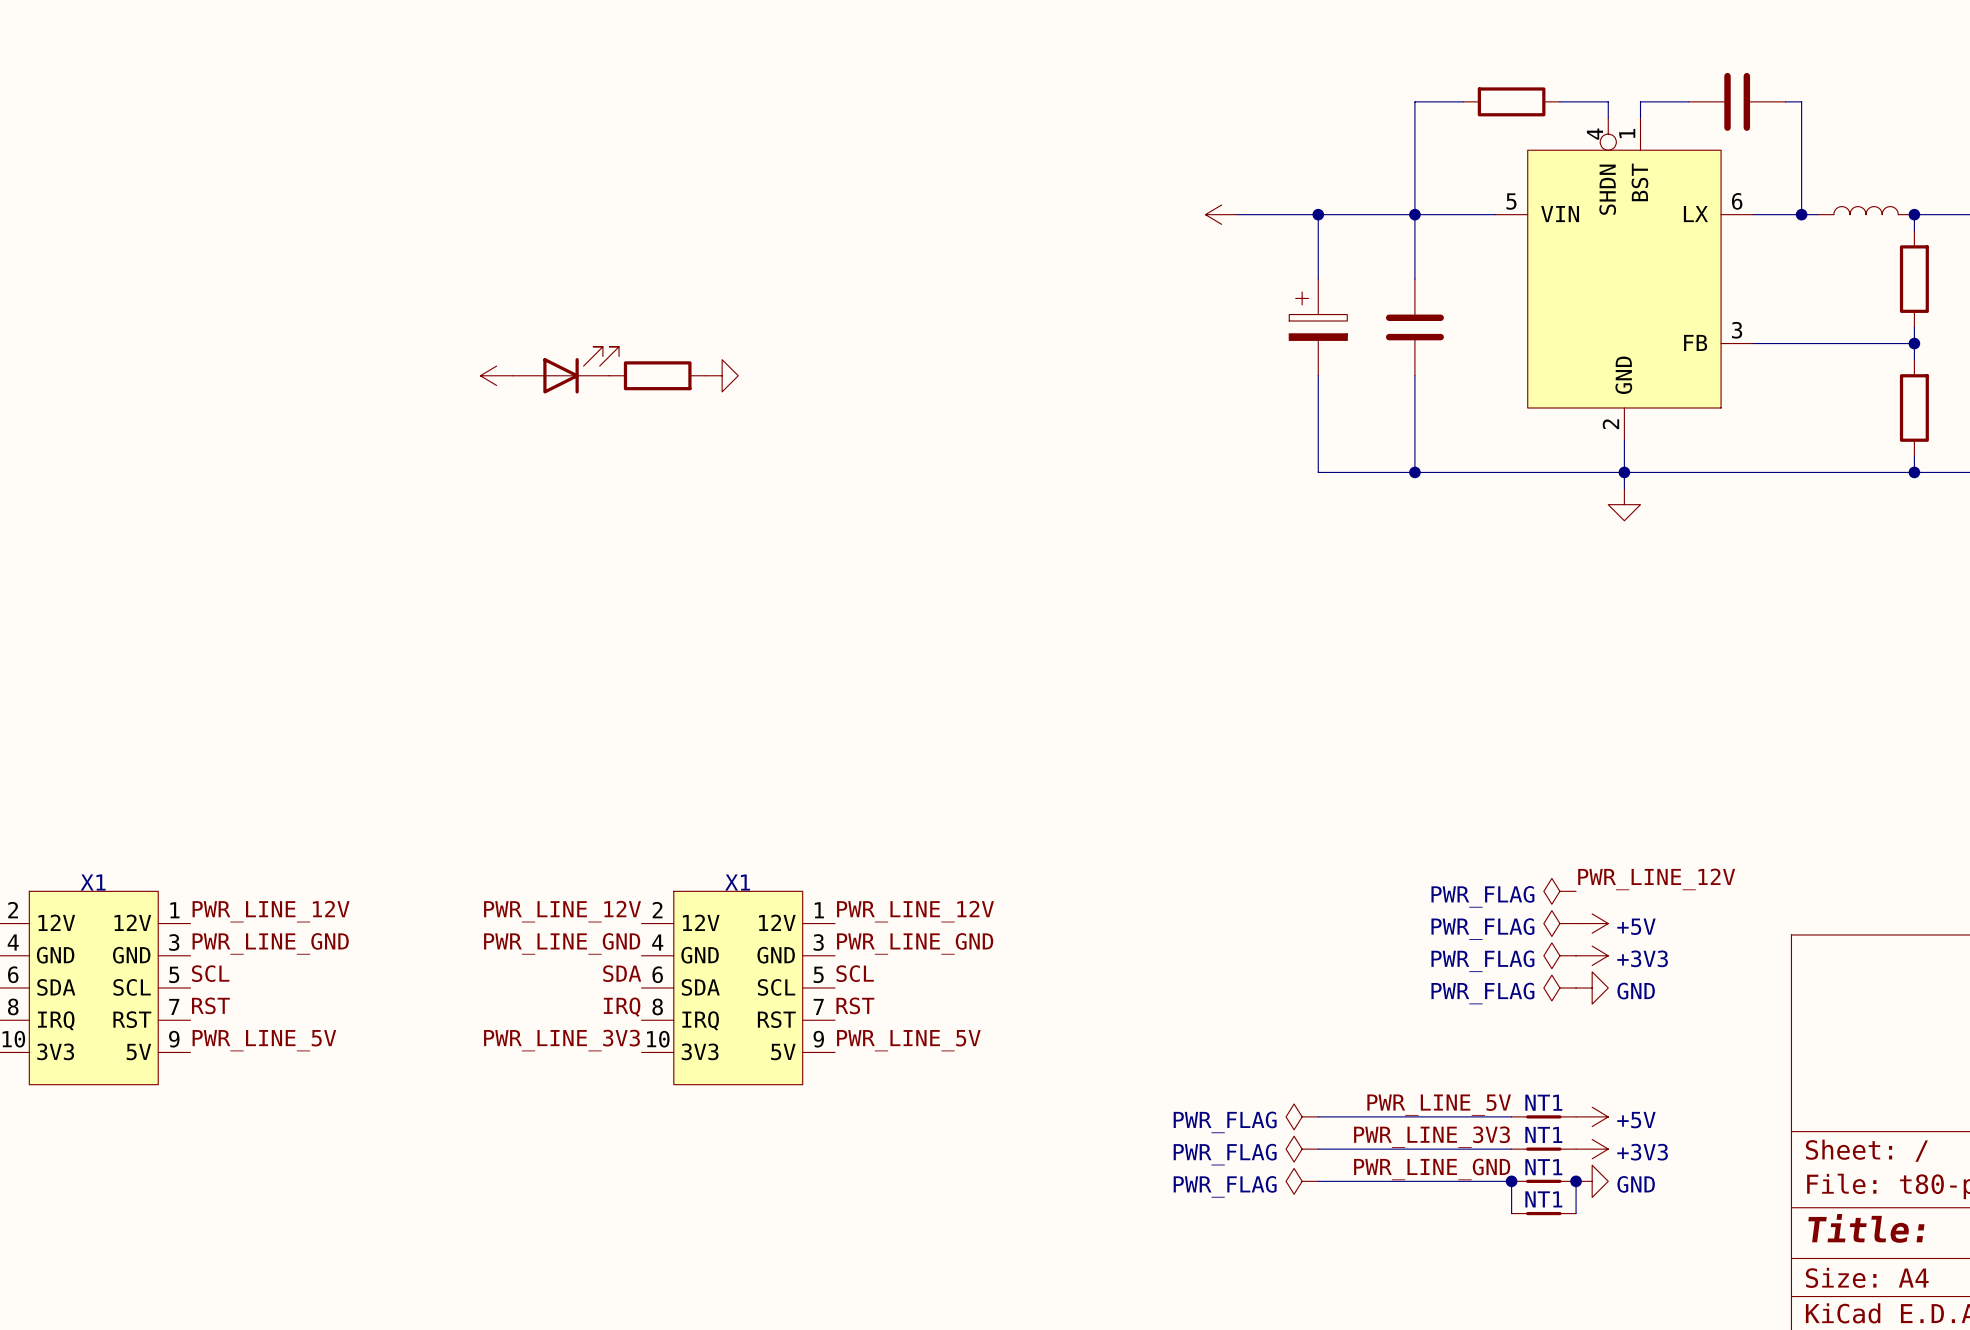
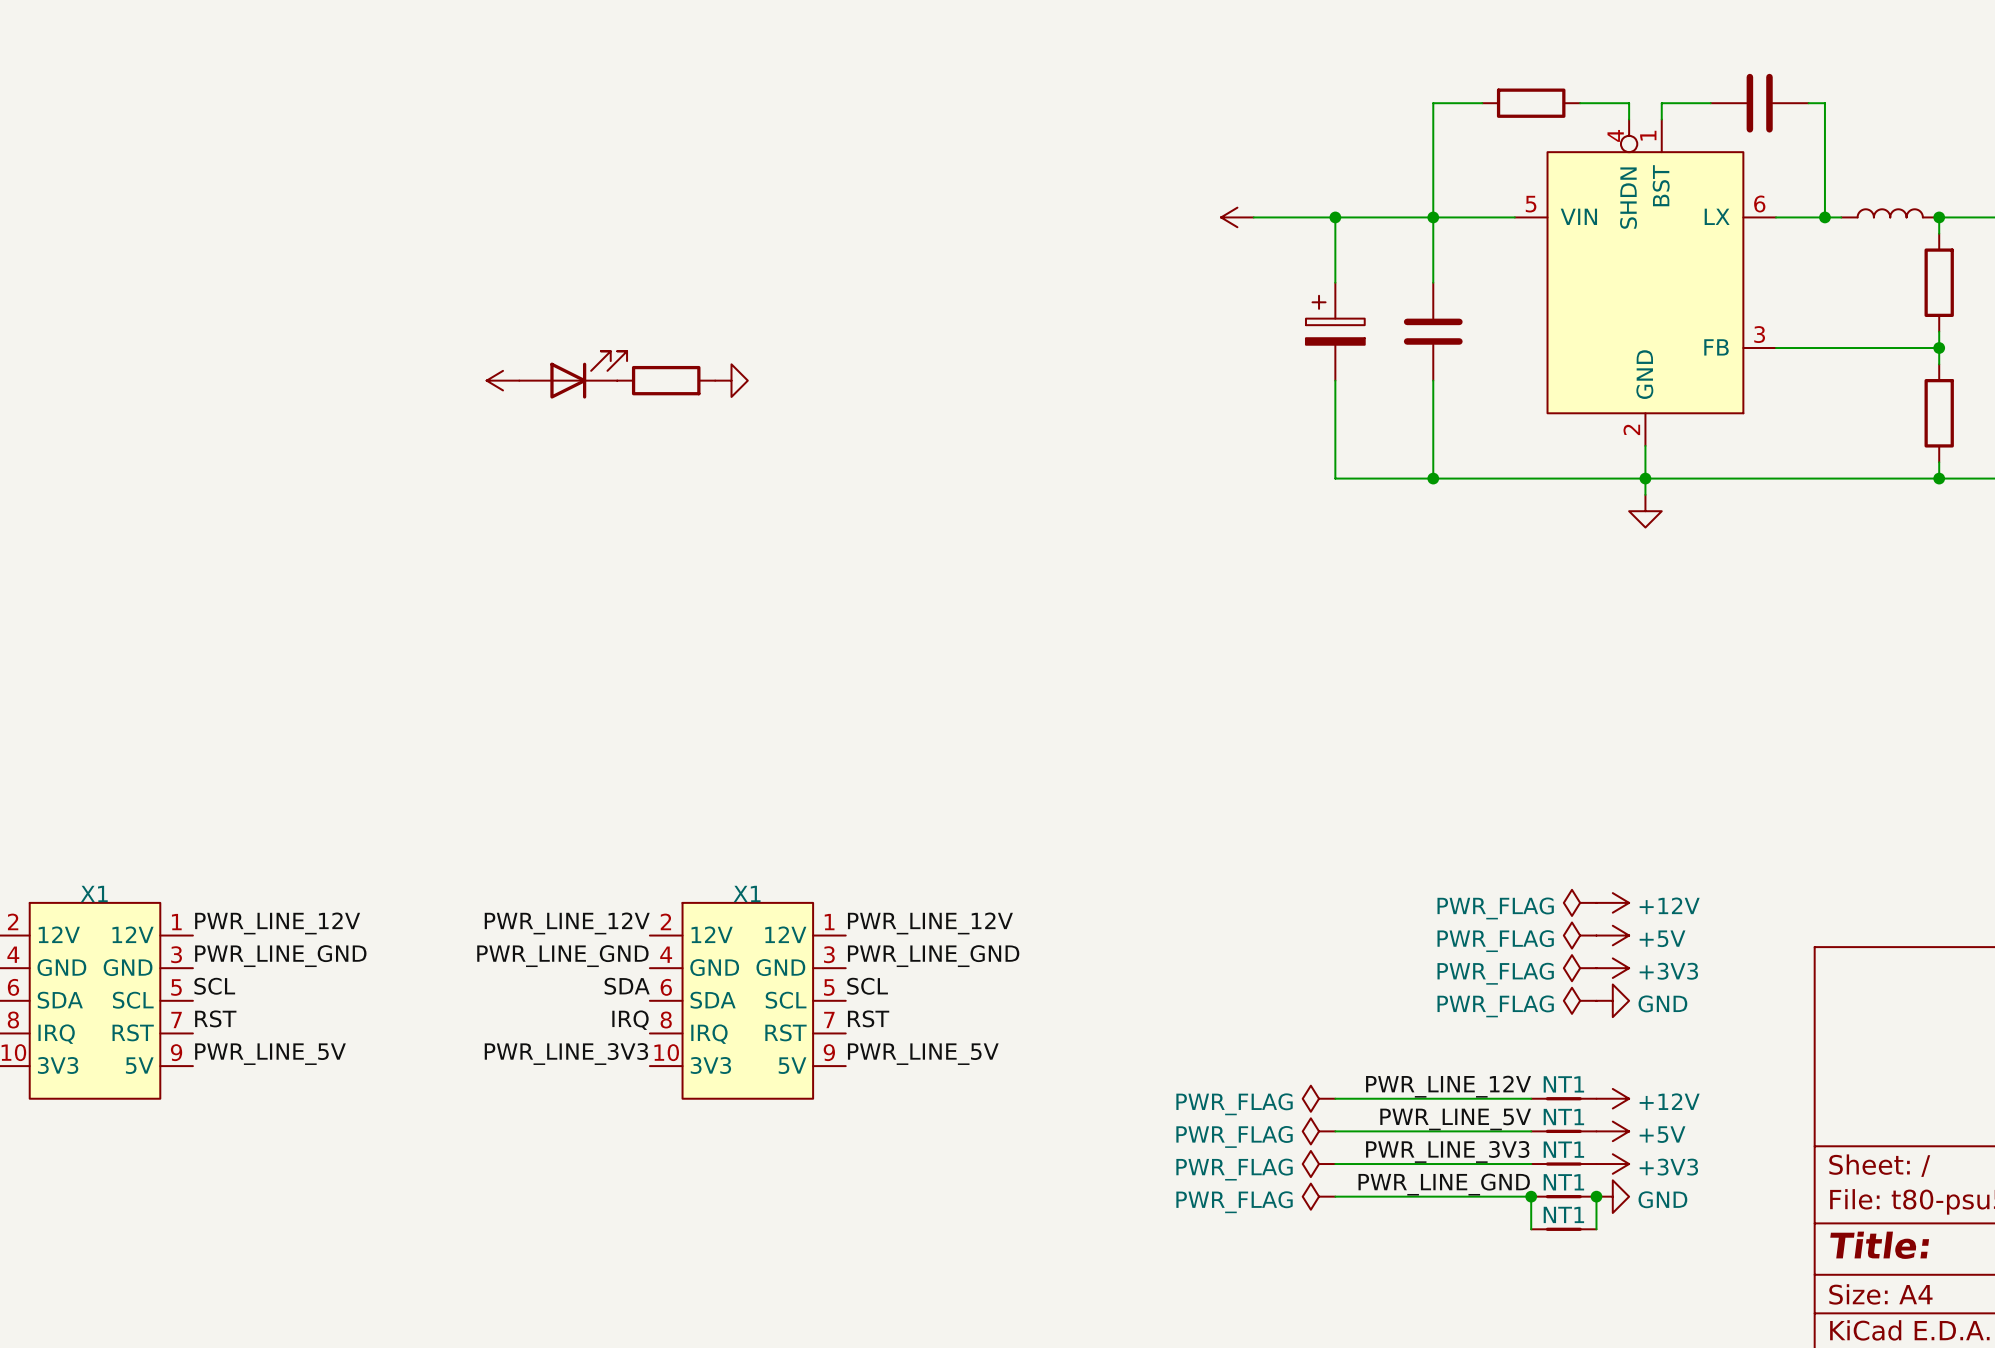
label position: PWR_LINE_12V (1656, 879) -> PWR_LINE_12V (1448, 1086)
power symbol: none -> +12V (1612, 902)
power symbol: none -> PWR_FLAG (1319, 1098)
wire: none -> (1335, 1098) (1531, 1098)
NT1: none -> (1563, 1098)
power symbol: none -> +12V (1612, 1098)

